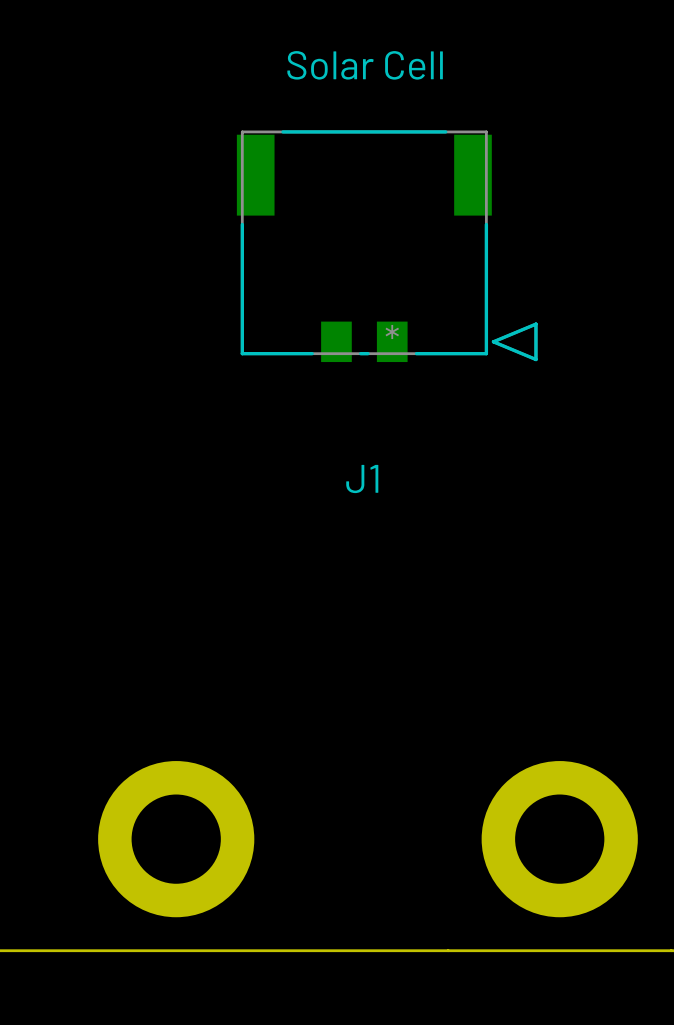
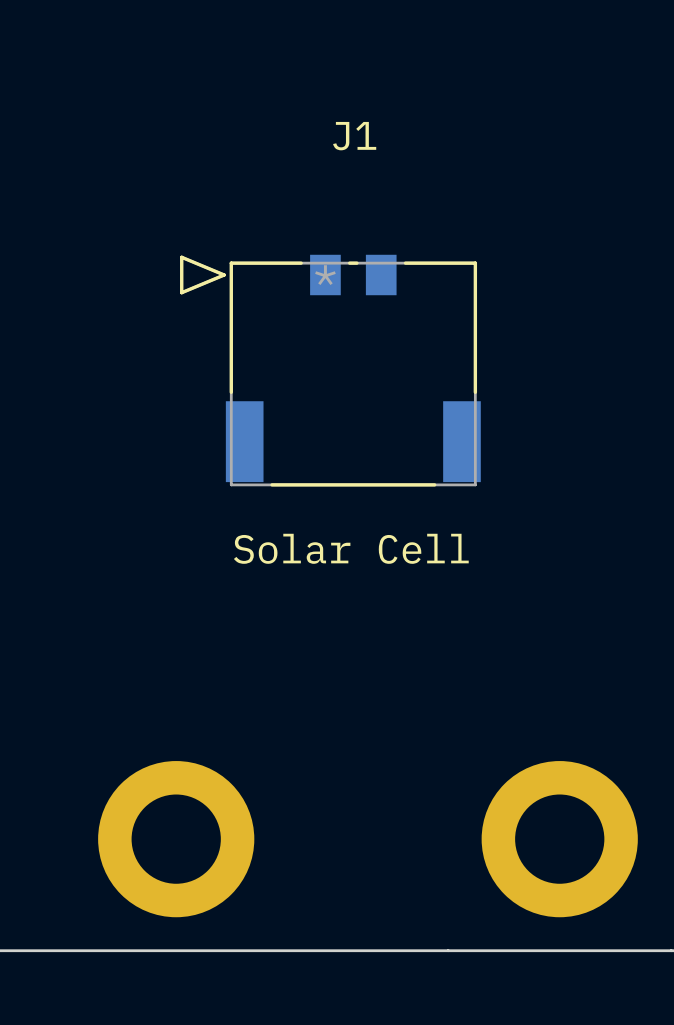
J1 rotation: 0° (387, 246) -> 180° (330, 370)

